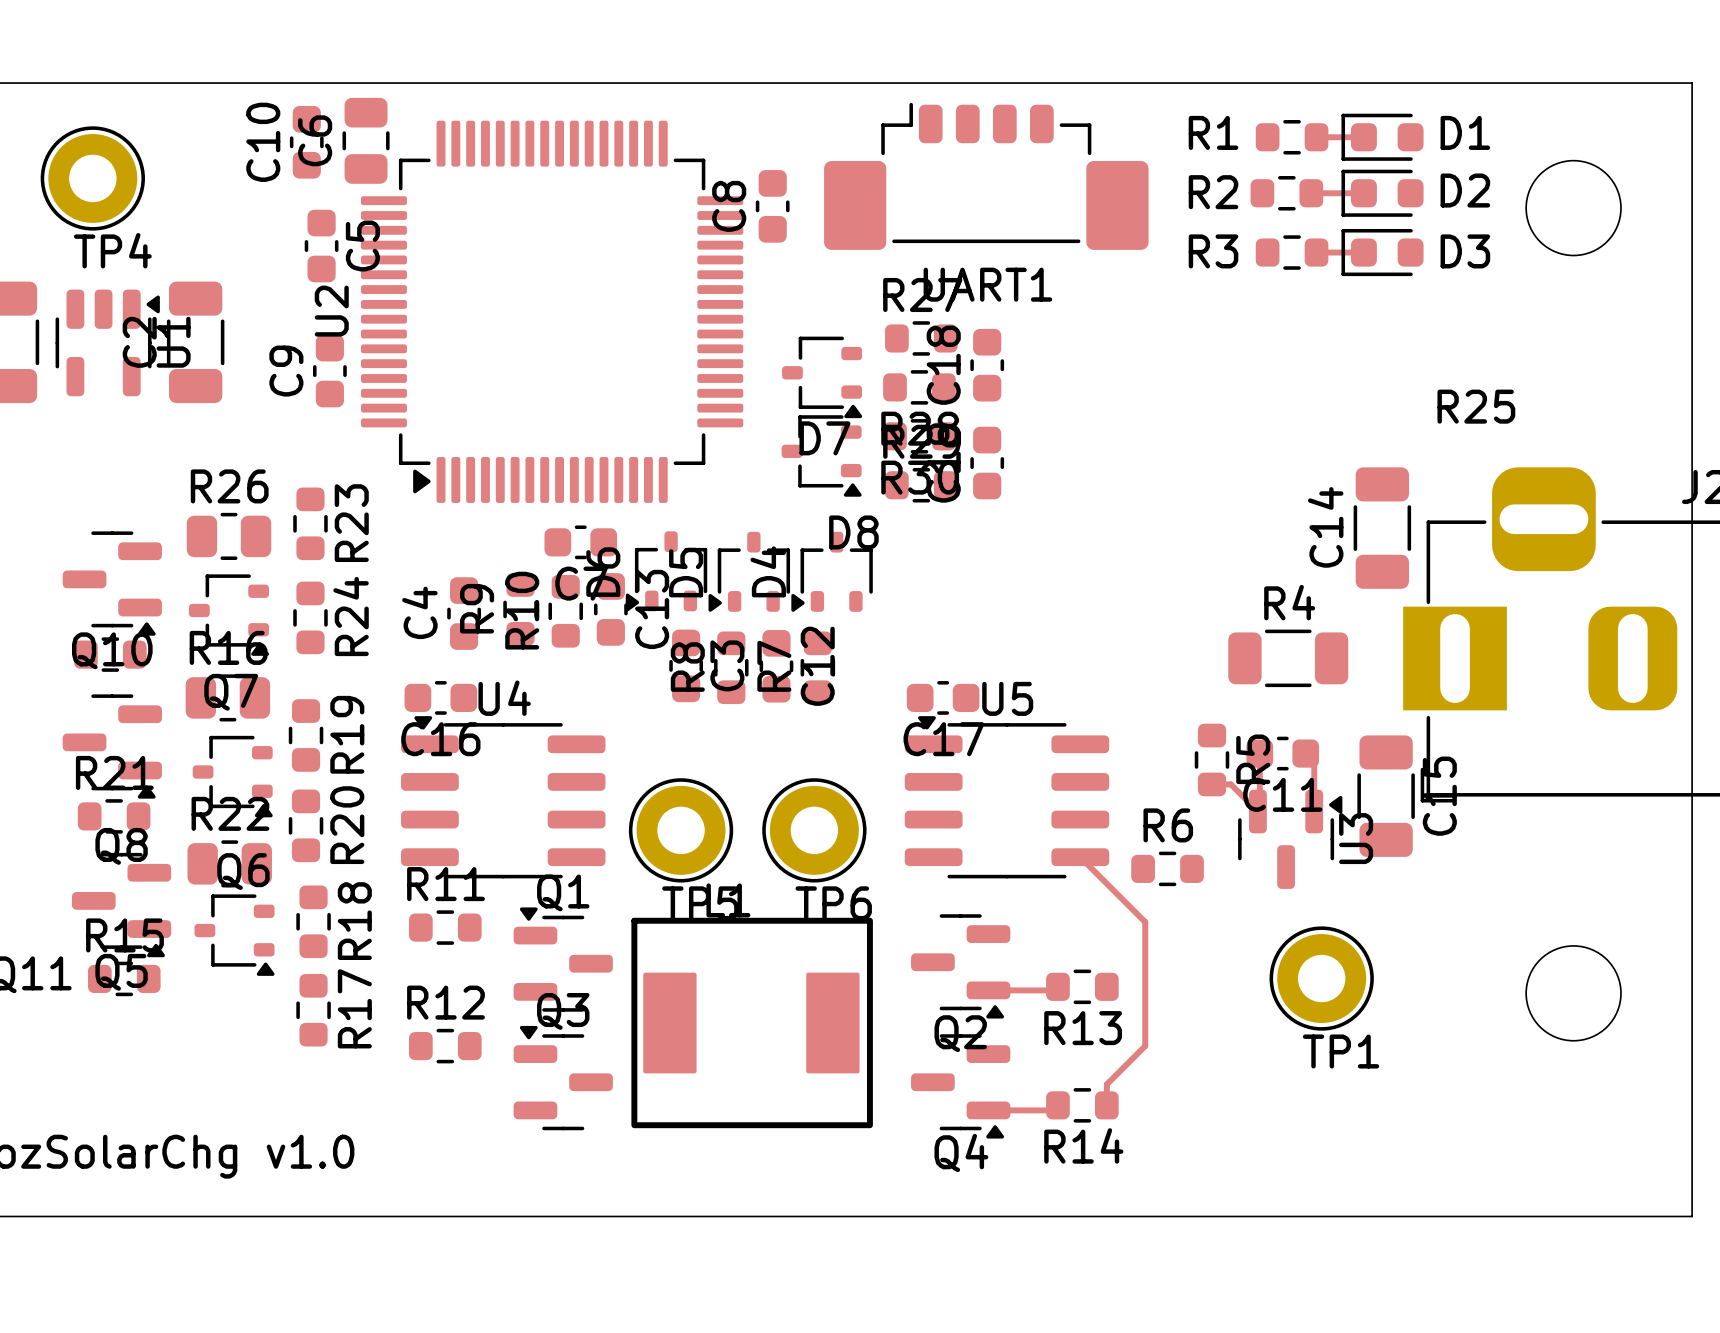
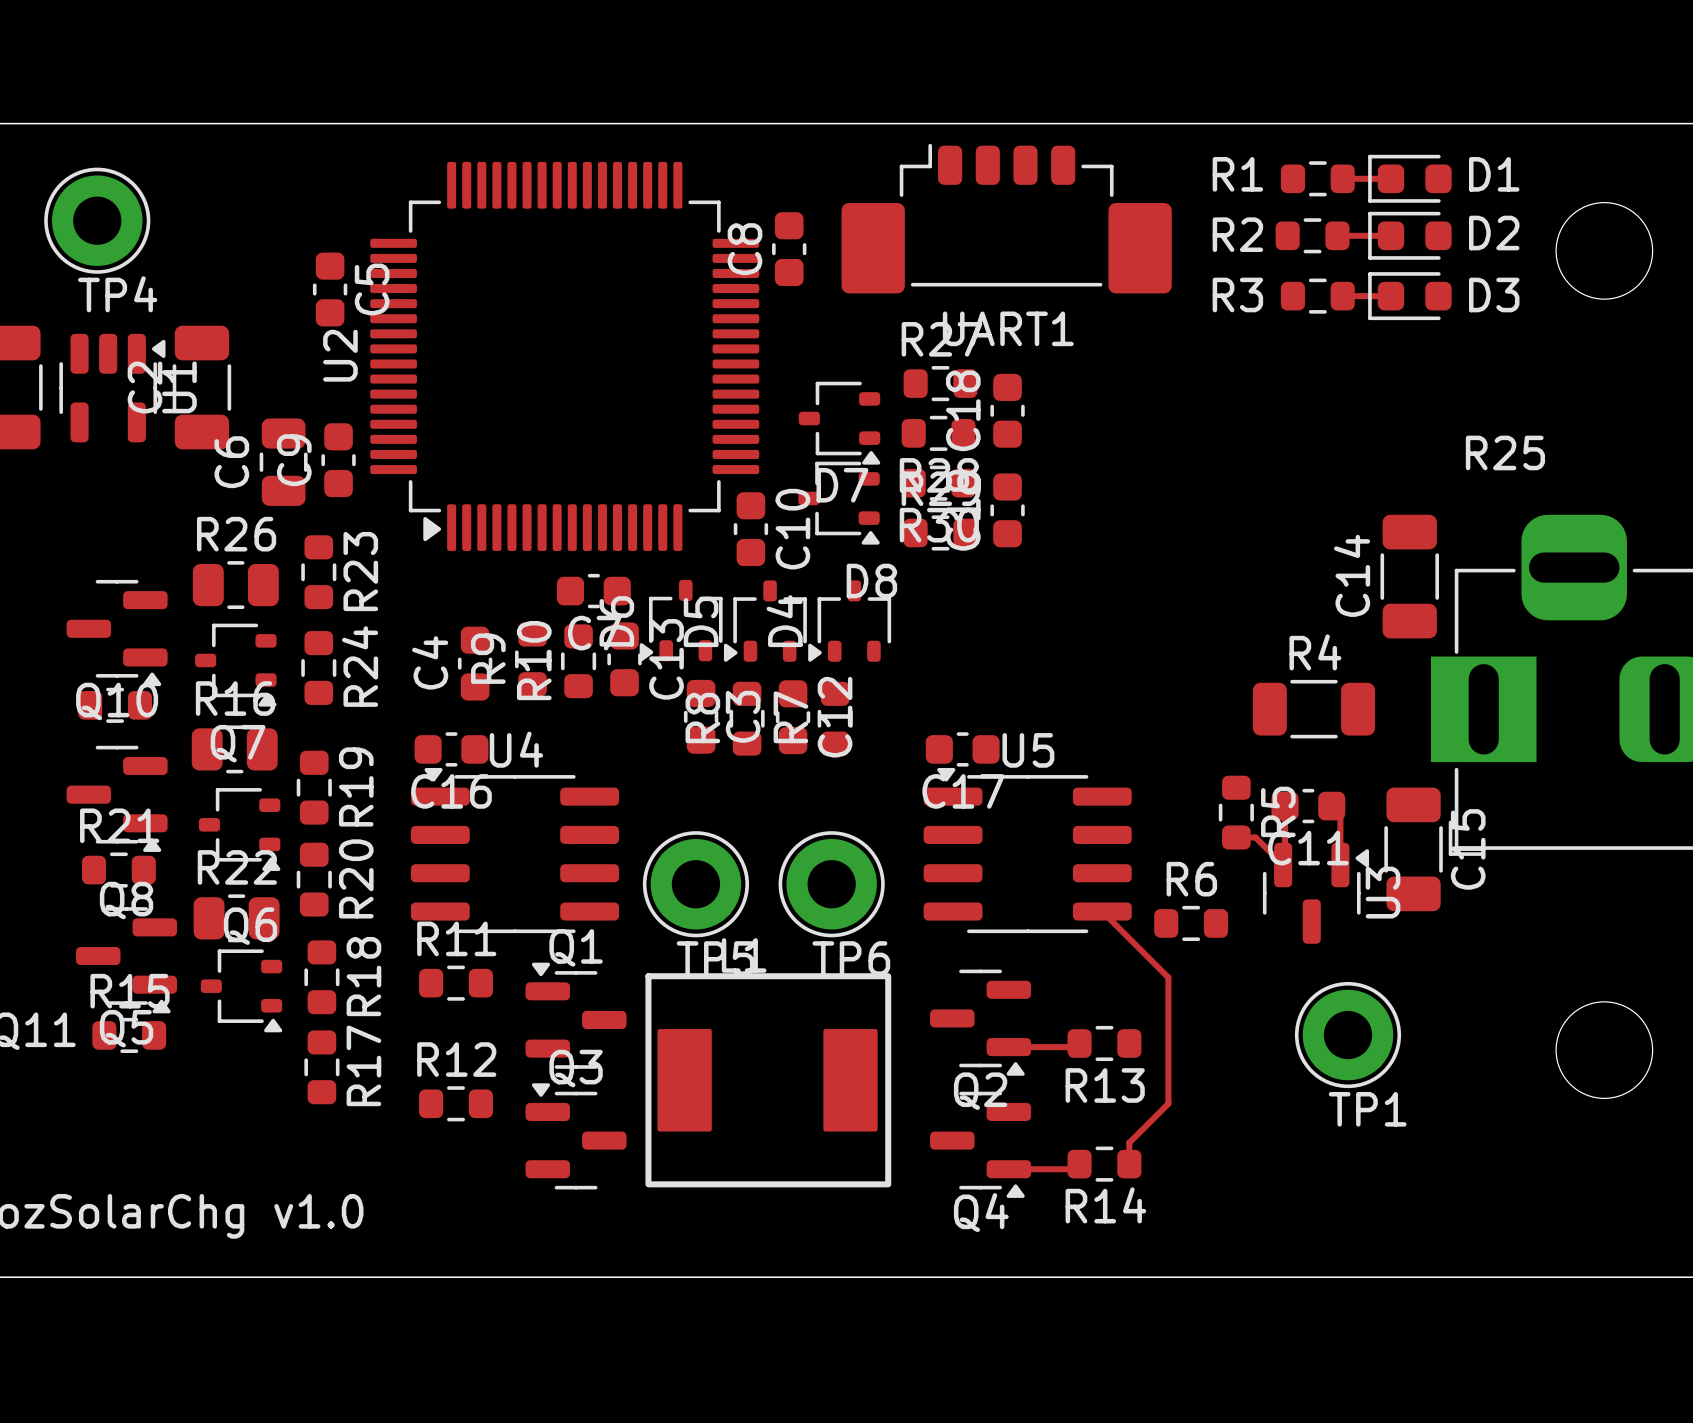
C6 position: (366, 140) -> (283, 462)
C10 name position: C10 (263, 142) -> C10 (792, 529)
C10 position: (306, 142) -> (750, 529)
C9 position: (329, 371) -> (338, 460)

